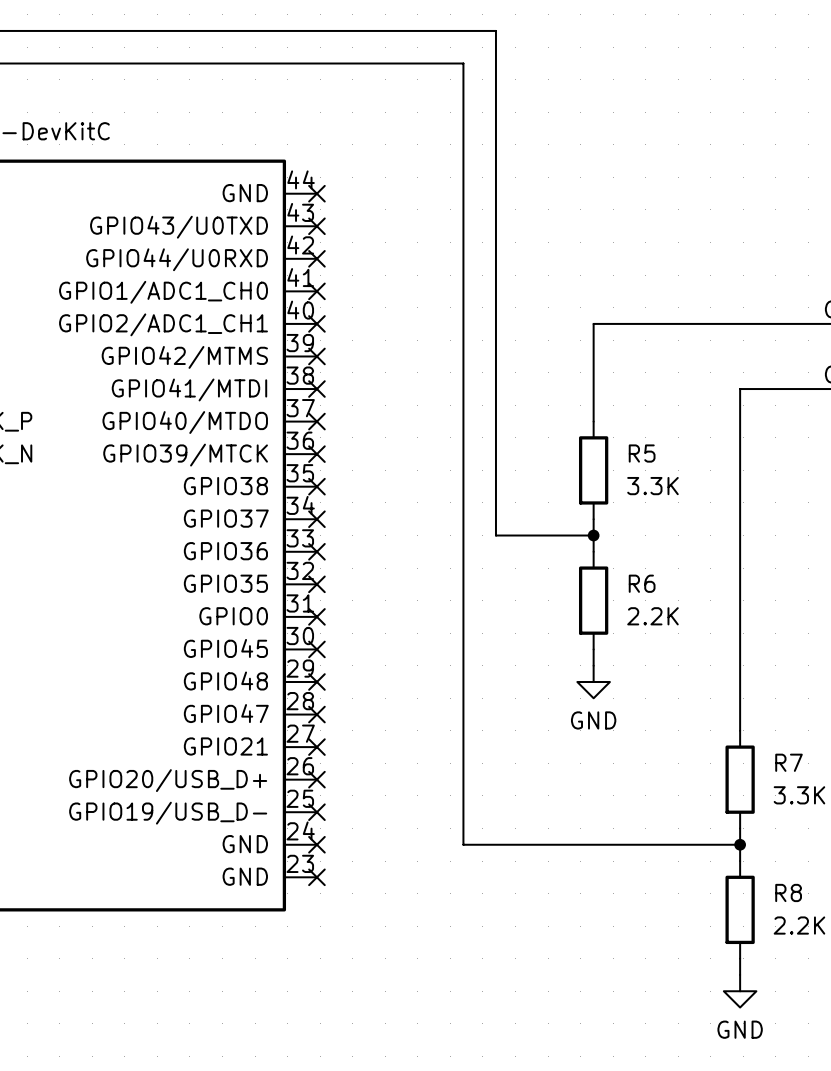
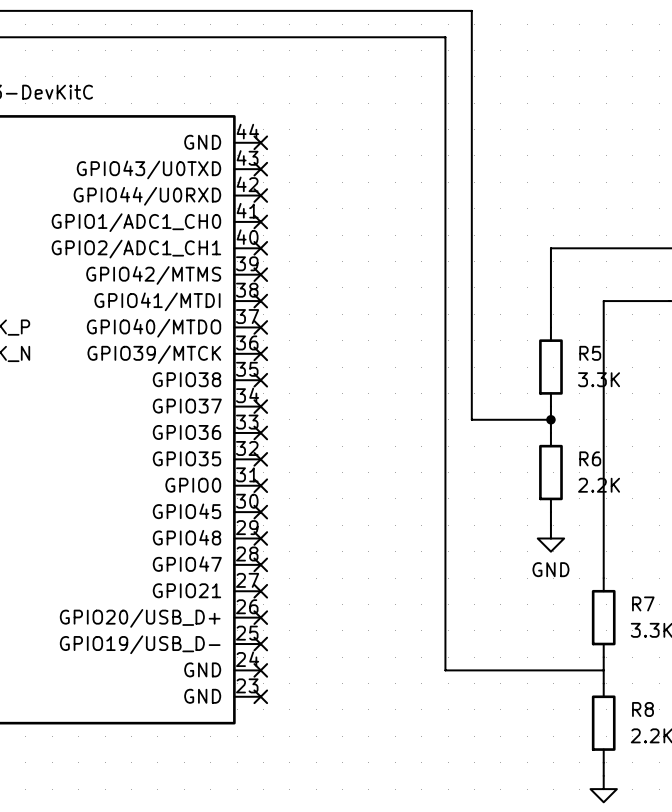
wire: (495, 30) (495, 535) (577, 535) -> (405, 10) (471, 10) (471, 419)
wire: (463, 63) (463, 844) (544, 844) -> (379, 37) (445, 37) (445, 670)
wire: (675, 323) (593, 323) (593, 421) -> (550, 248) (550, 327)
R5 position: (593, 470) -> (550, 367)
wire: (593, 519) (593, 551) -> (550, 406) (550, 432)
wire: none -> (485, 419) (550, 419)
junction: (593, 535) -> none
junction: none -> (550, 419)
R6 position: (593, 600) -> (550, 472)
wire: (593, 649) (593, 665) -> (550, 512) (550, 525)
power symbol position: GND (593, 682) -> GND (550, 538)
junction: (740, 844) -> none

